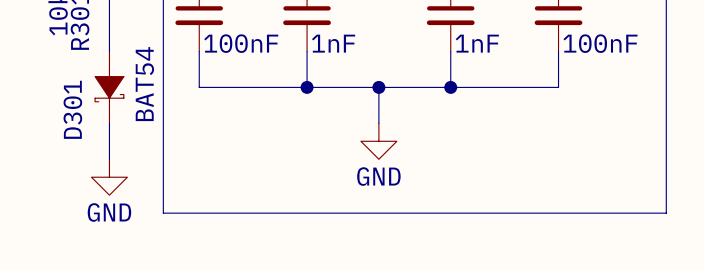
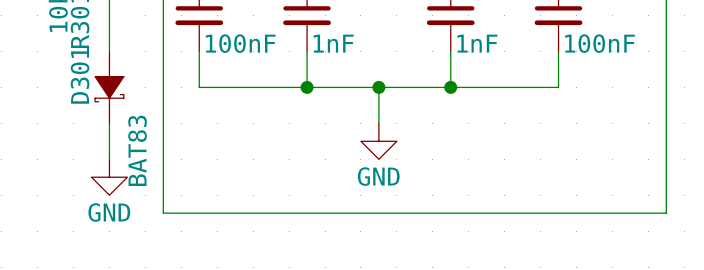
D301 value: BAT54 (144, 84) -> BAT83 (137, 150)
D301 name position: D301 (72, 109) -> D301 (80, 75)

